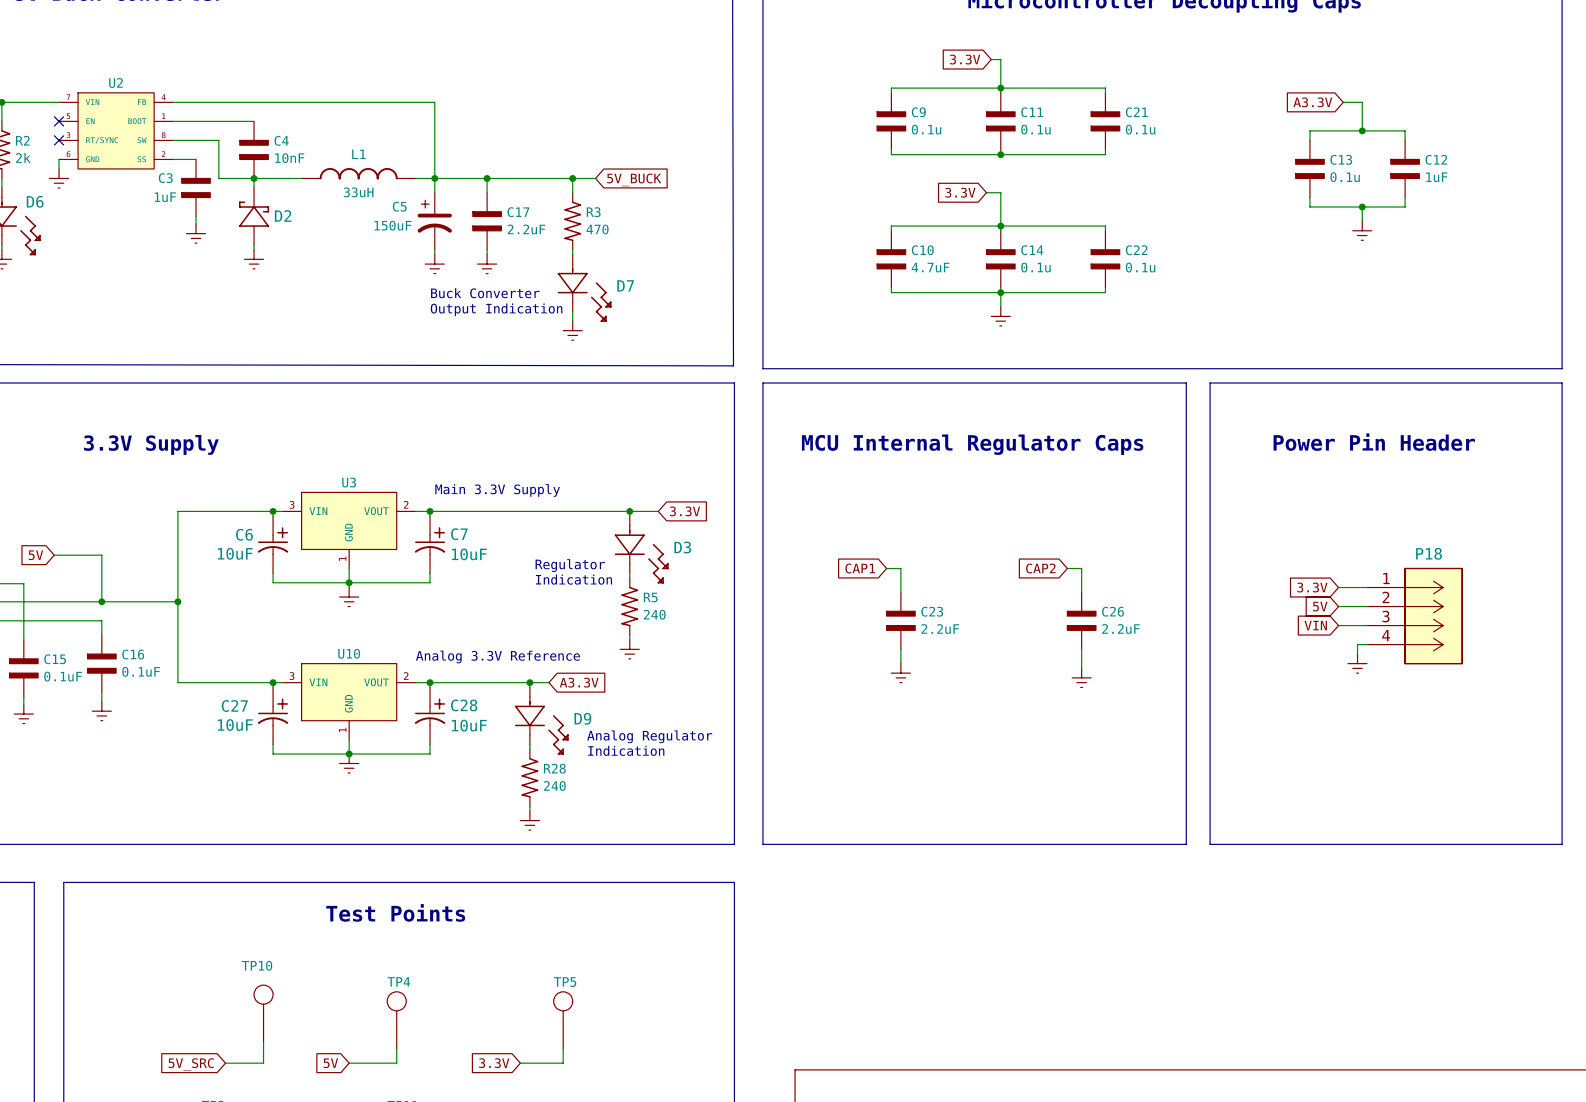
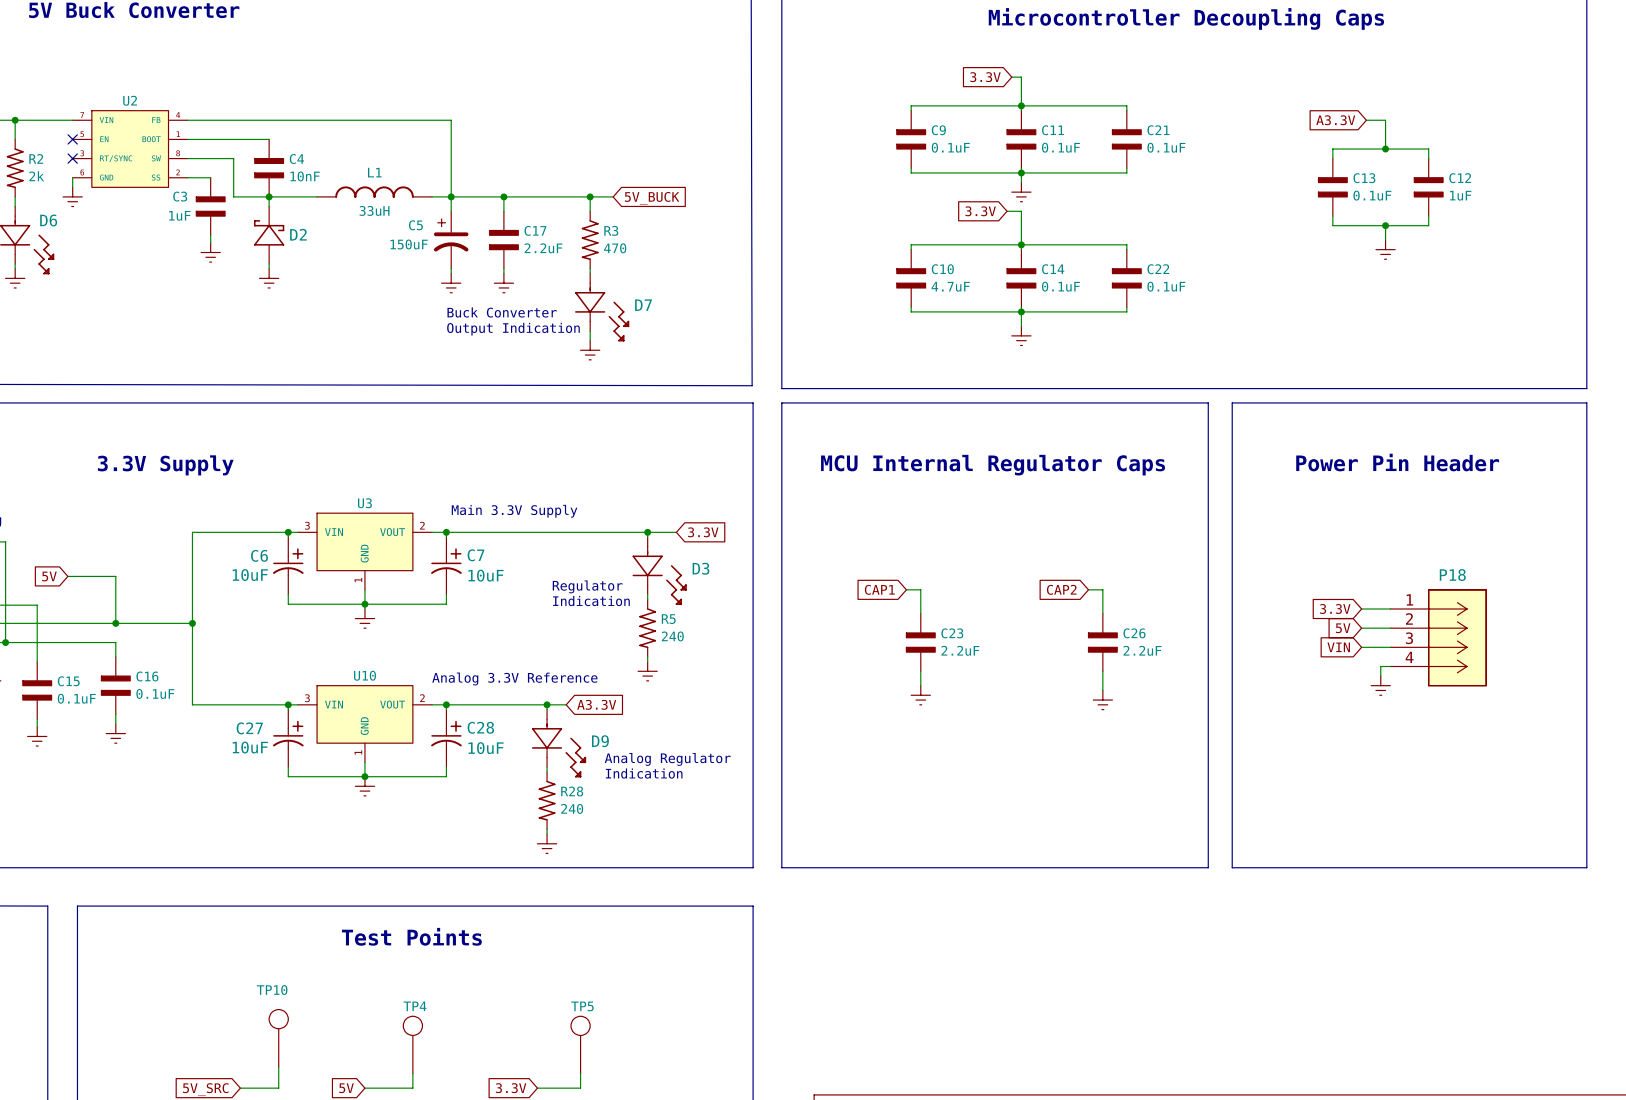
C9 value: 0.1u (926, 129) -> 0.1uF (950, 147)
C11 value: 0.1u (1035, 129) -> 0.1uF (1060, 147)
C21 value: 0.1u (1140, 129) -> 0.1uF (1166, 147)
wire: none -> (1021, 172) (1021, 182)
power symbol: none -> (1021, 192)
C13 value: 0.1u (1345, 177) -> 0.1uF (1372, 195)
C14 value: 0.1u (1035, 267) -> 0.1uF (1060, 286)
C22 value: 0.1u (1140, 267) -> 0.1uF (1166, 286)

